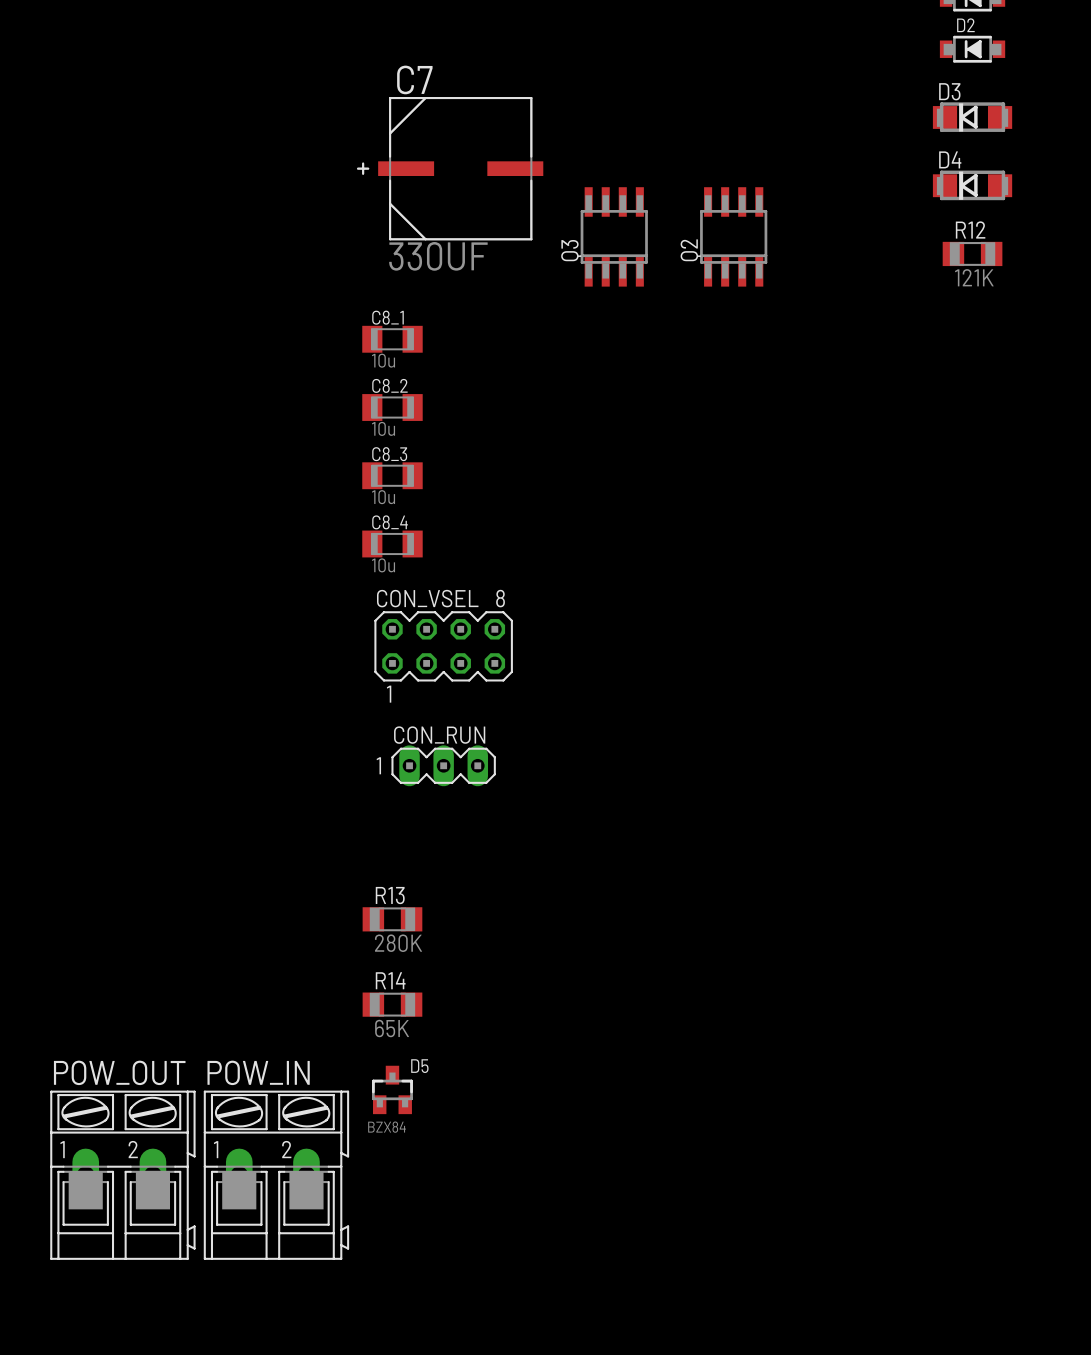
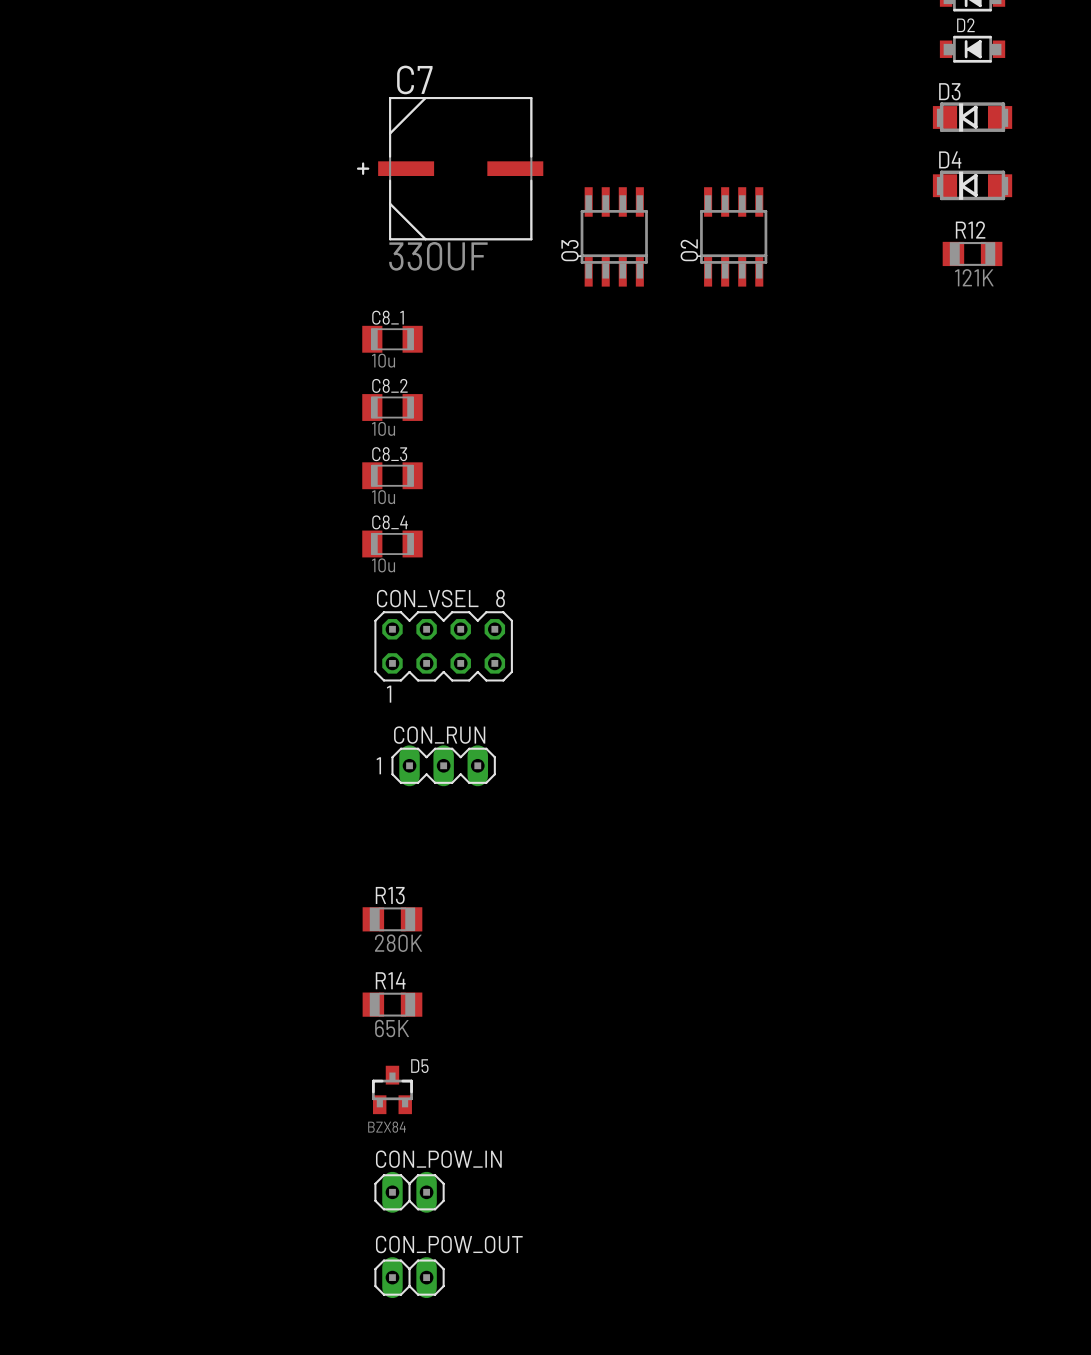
POW_OUT: (122, 1175) -> none
POW_IN: (276, 1175) -> none
CON_POW_IN: none -> (409, 1192)
CON_POW_OUT: none -> (409, 1277)

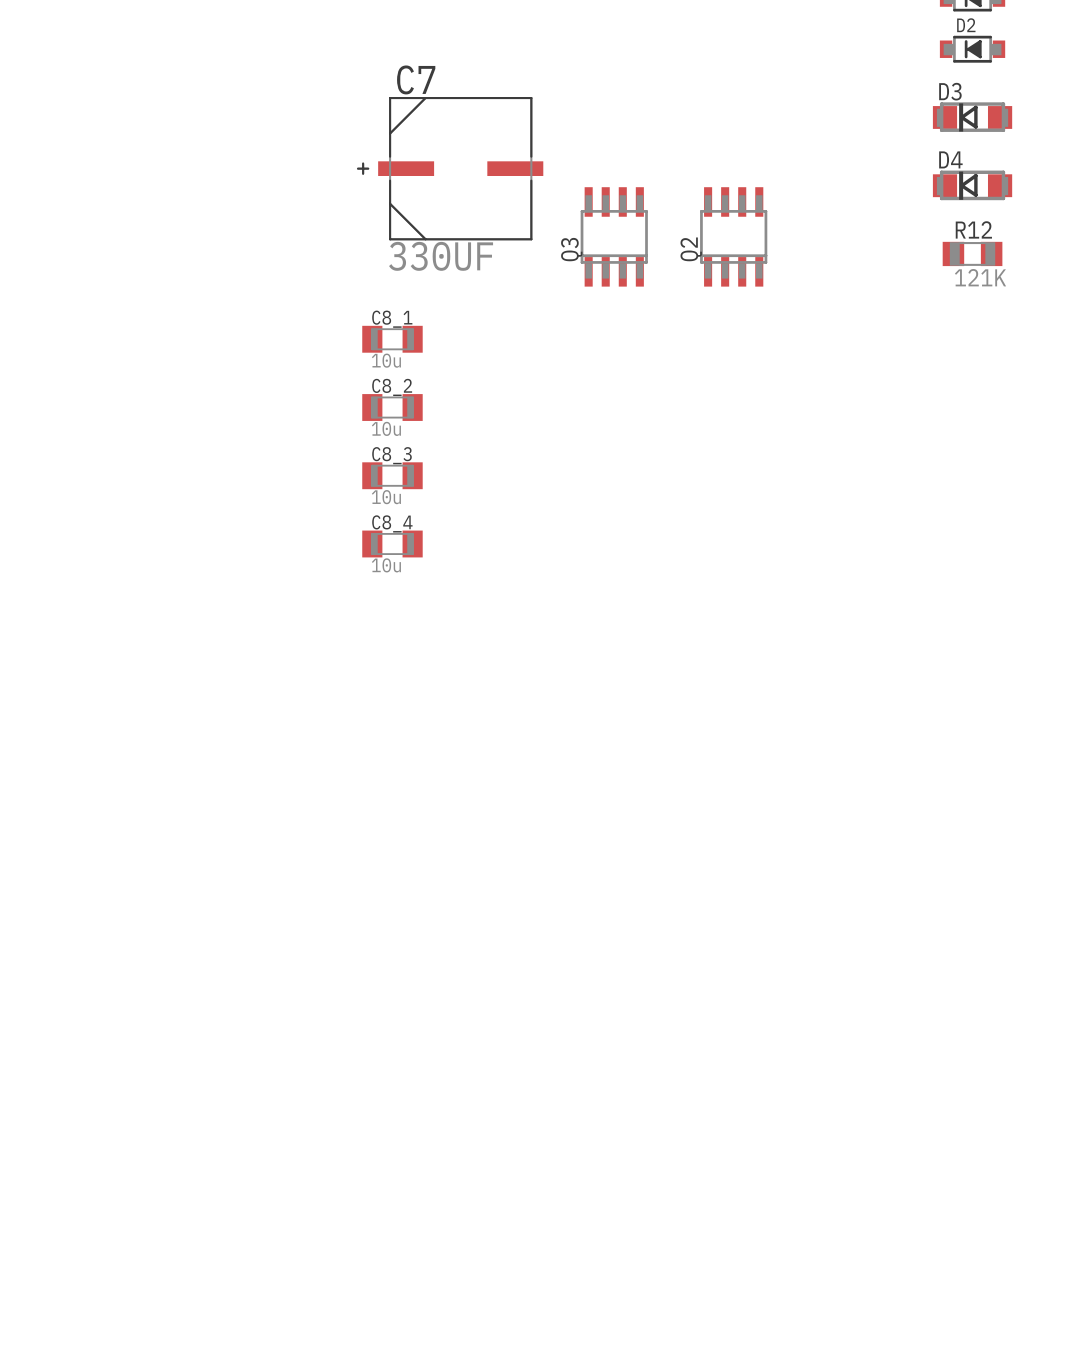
CON_VSEL: (443, 646) -> none
CON_RUN: (443, 765) -> none
R13: 280K (392, 919) -> none
R14: 65K (392, 1004) -> none
D5: BZX84 (392, 1089) -> none
CON_POW_IN: (409, 1192) -> none
CON_POW_OUT: (409, 1277) -> none

